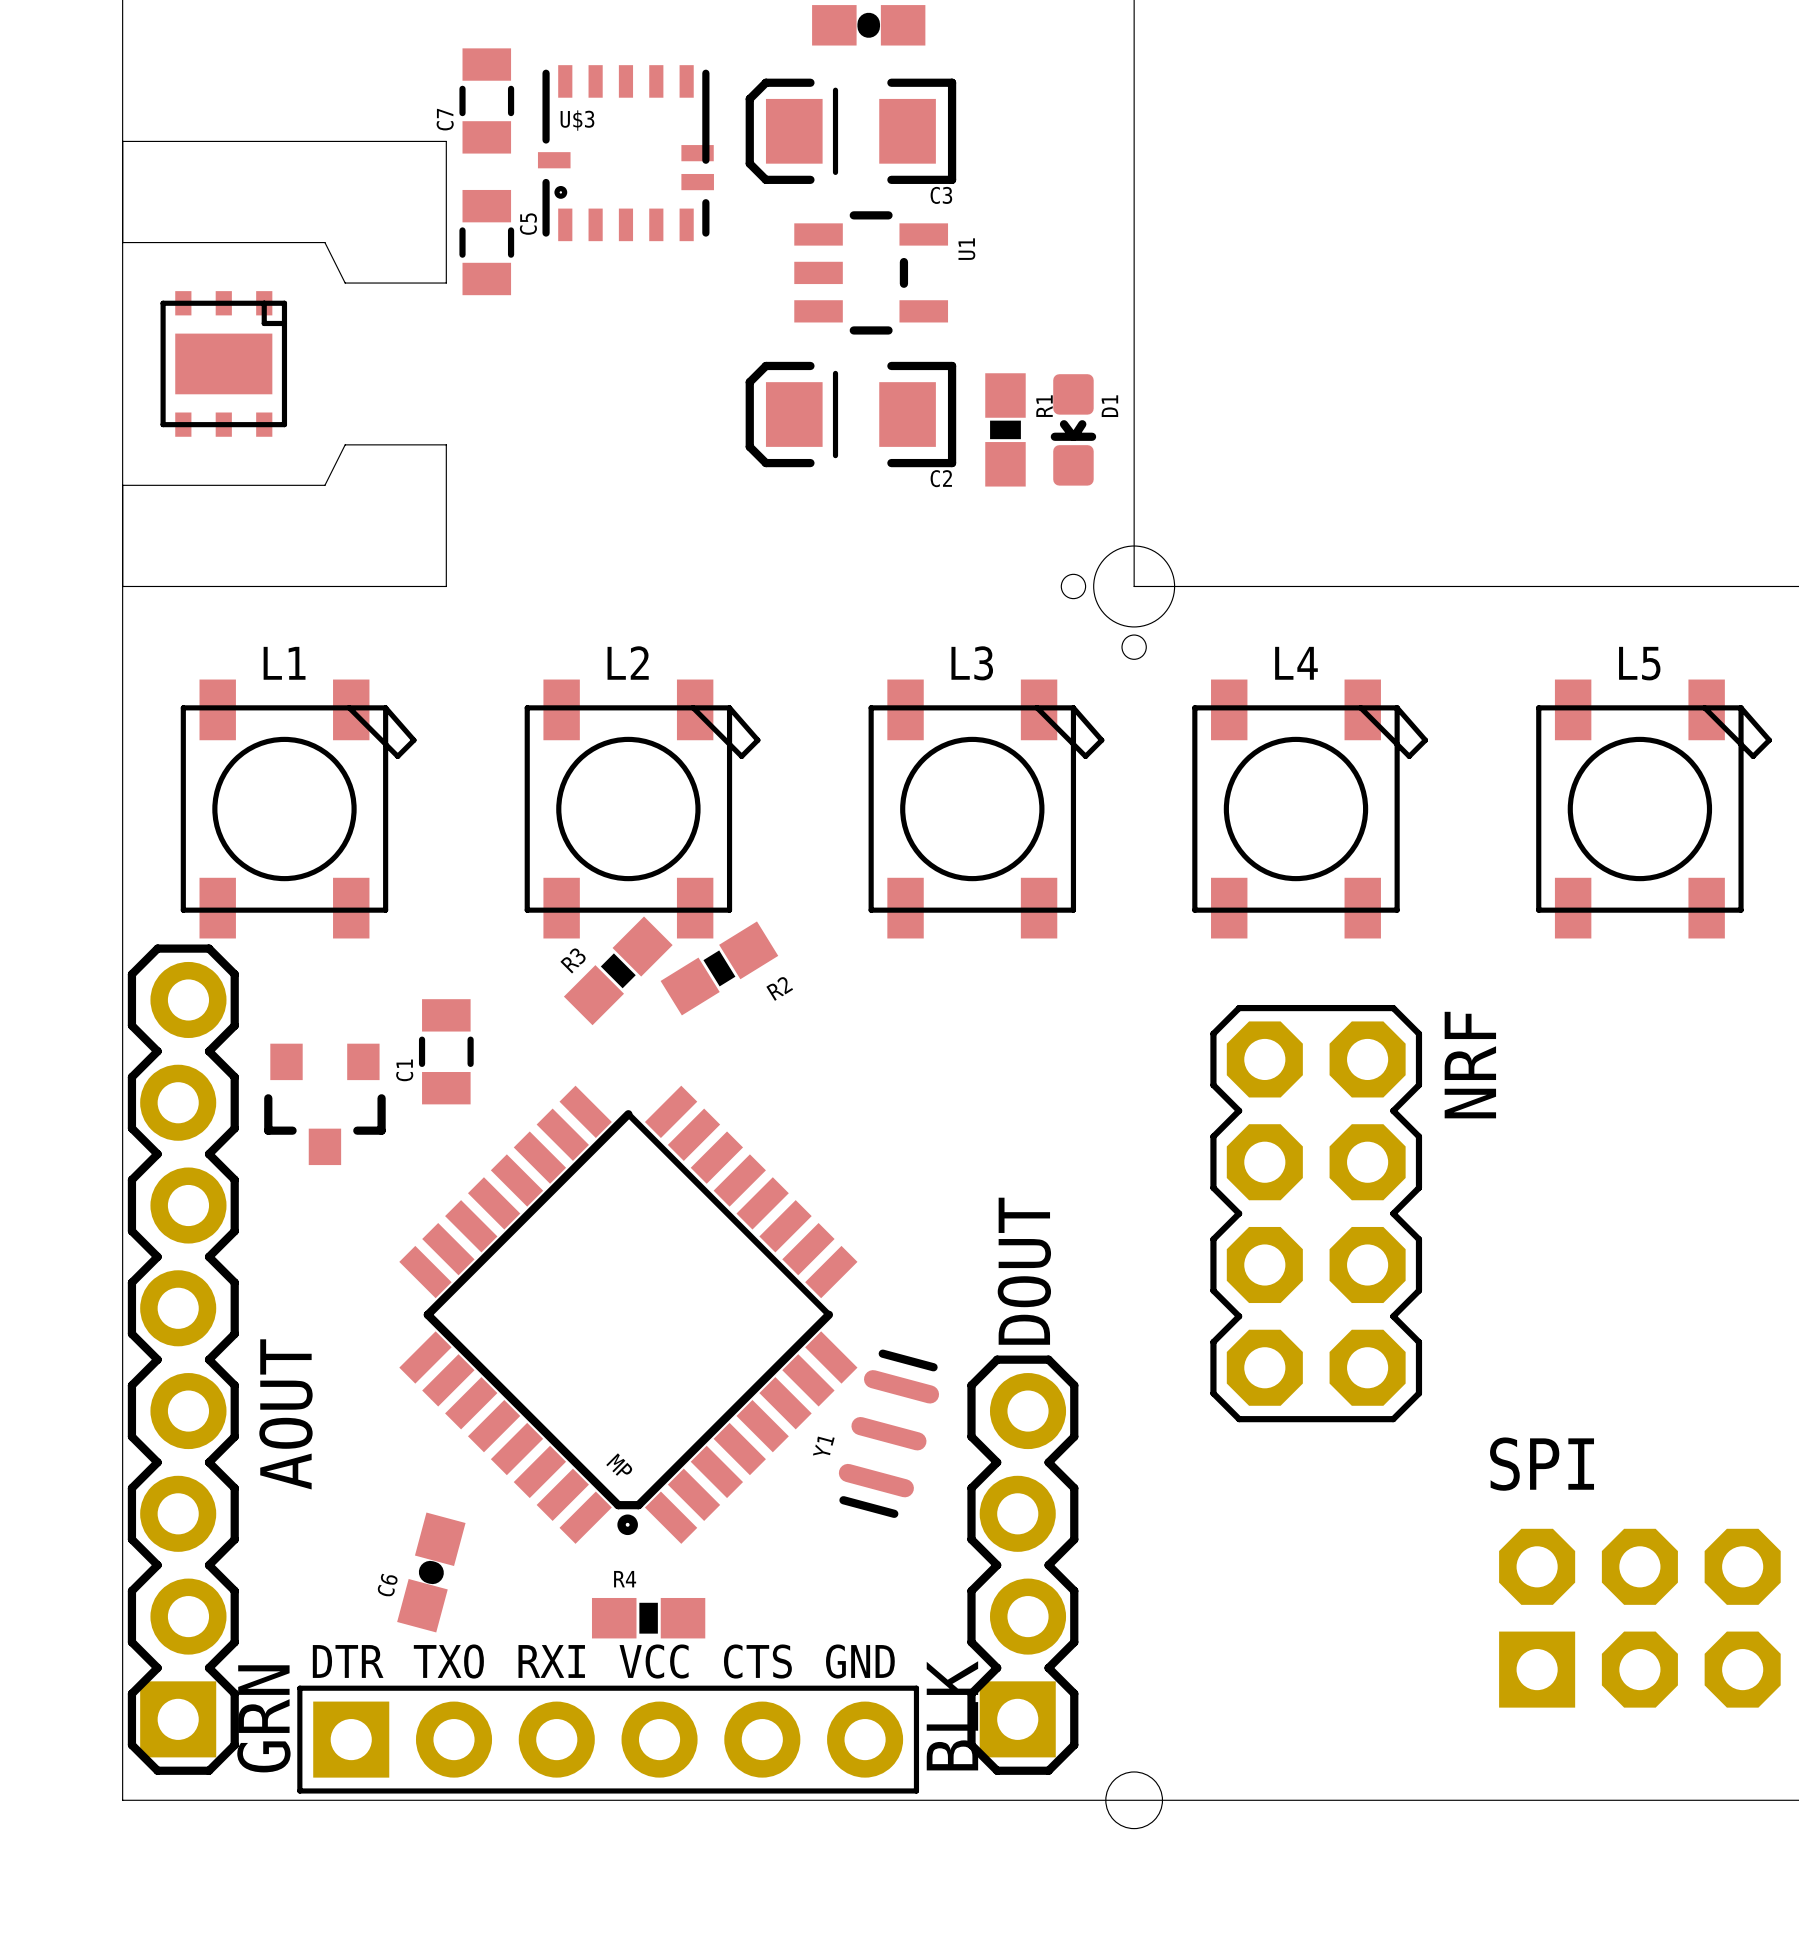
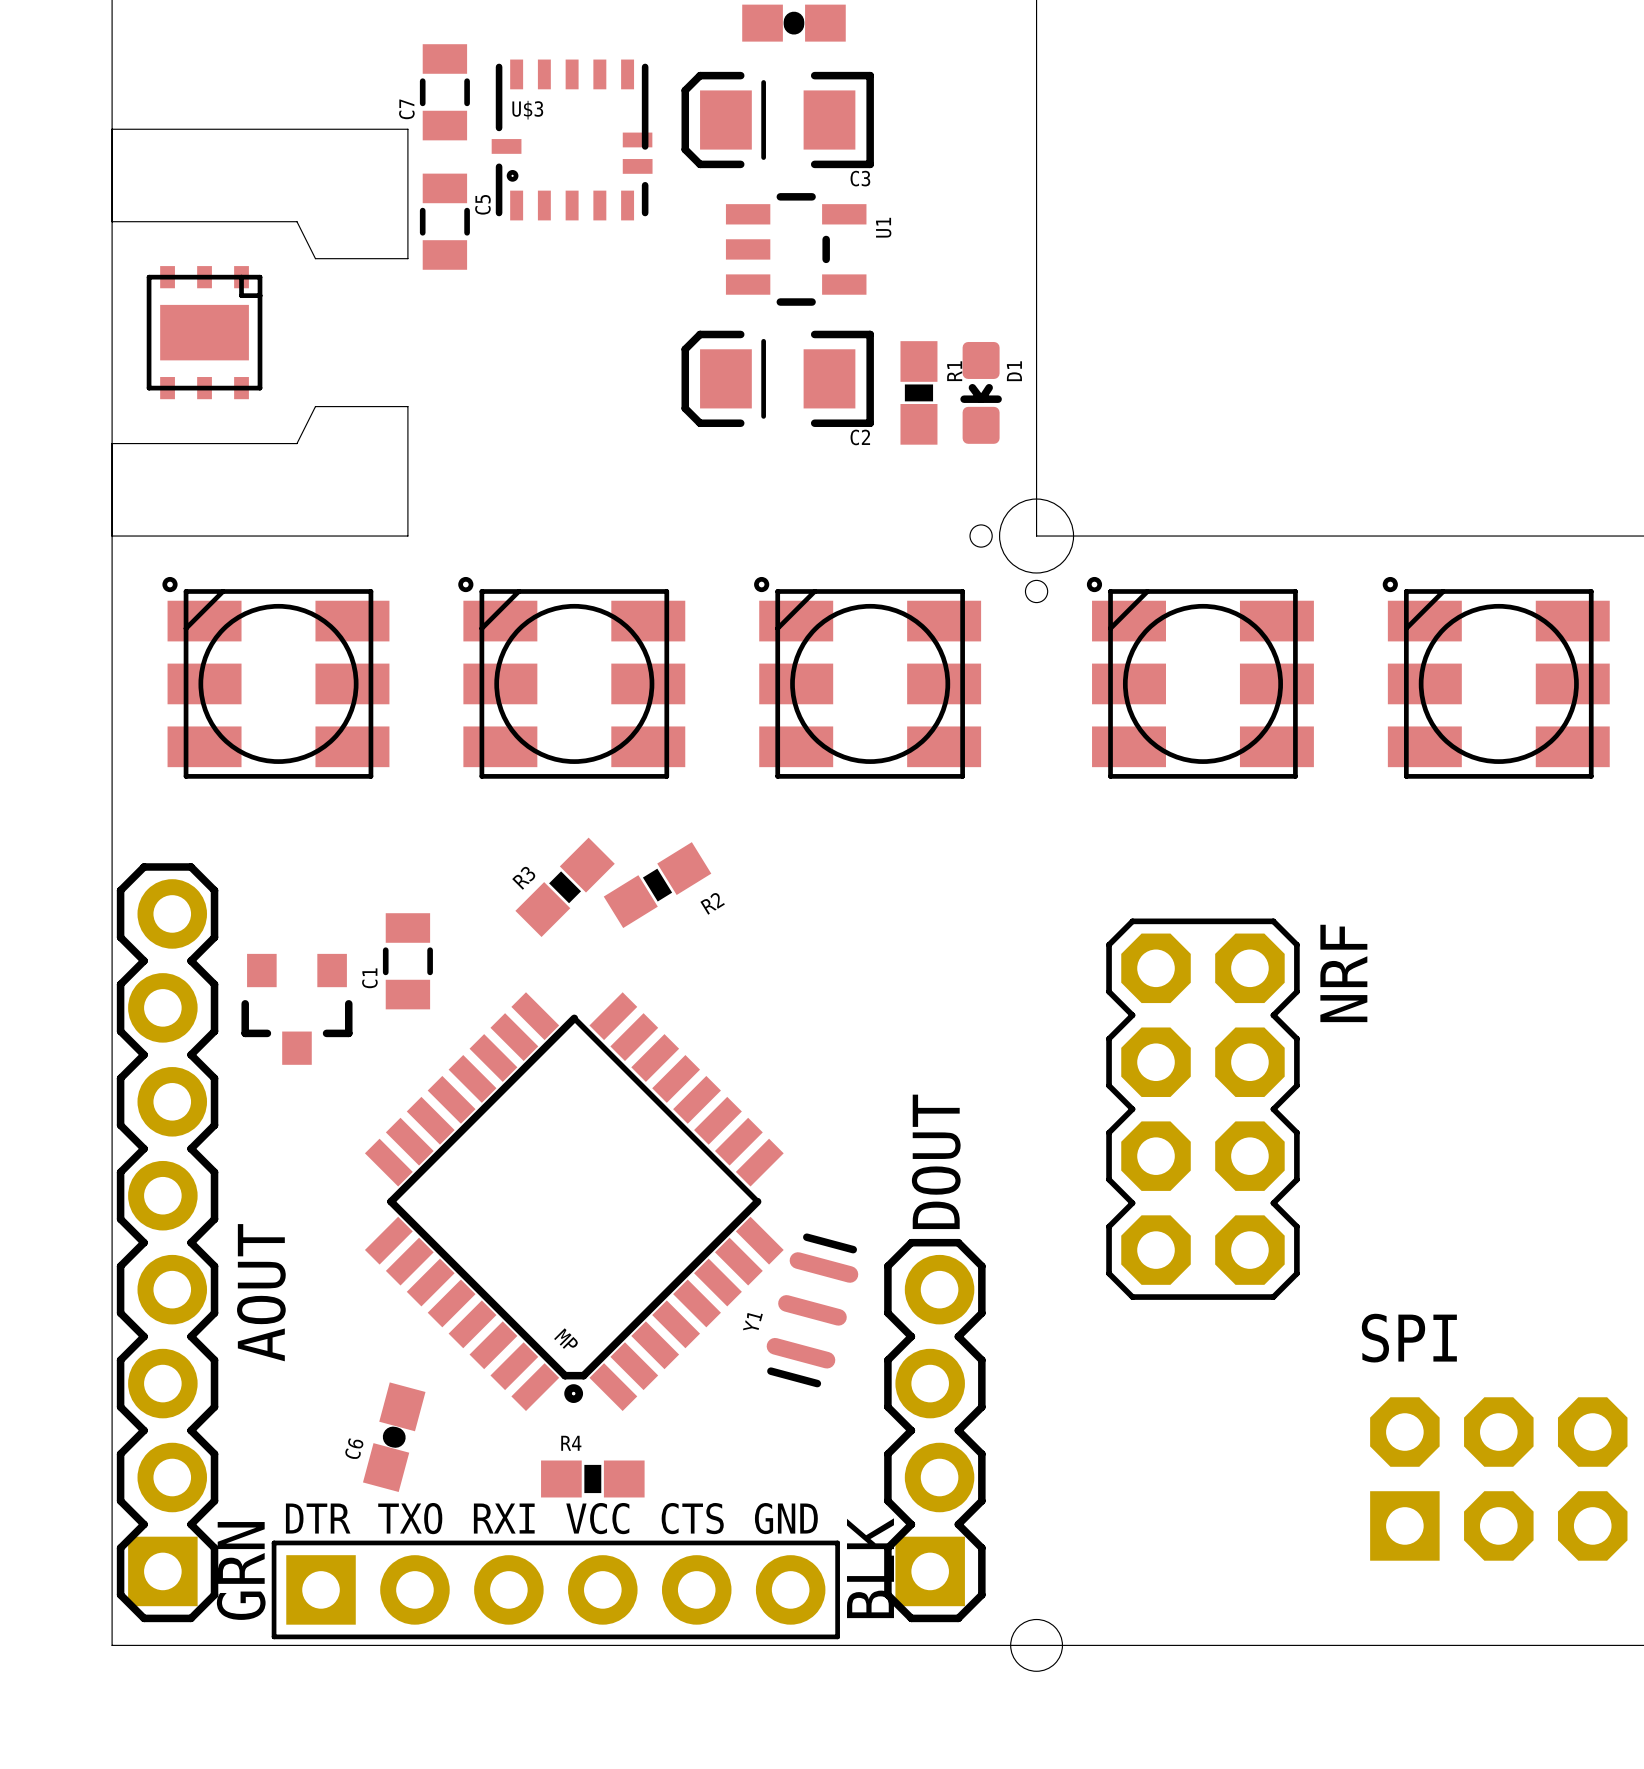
part: none -> (275, 677)
part: none -> (571, 677)
part: none -> (867, 677)
part: none -> (1200, 677)
part: none -> (1496, 677)
L1: (298, 809) -> none
L2: (642, 809) -> none
L3: (986, 809) -> none
L4: (1310, 809) -> none
L5: (1654, 809) -> none

